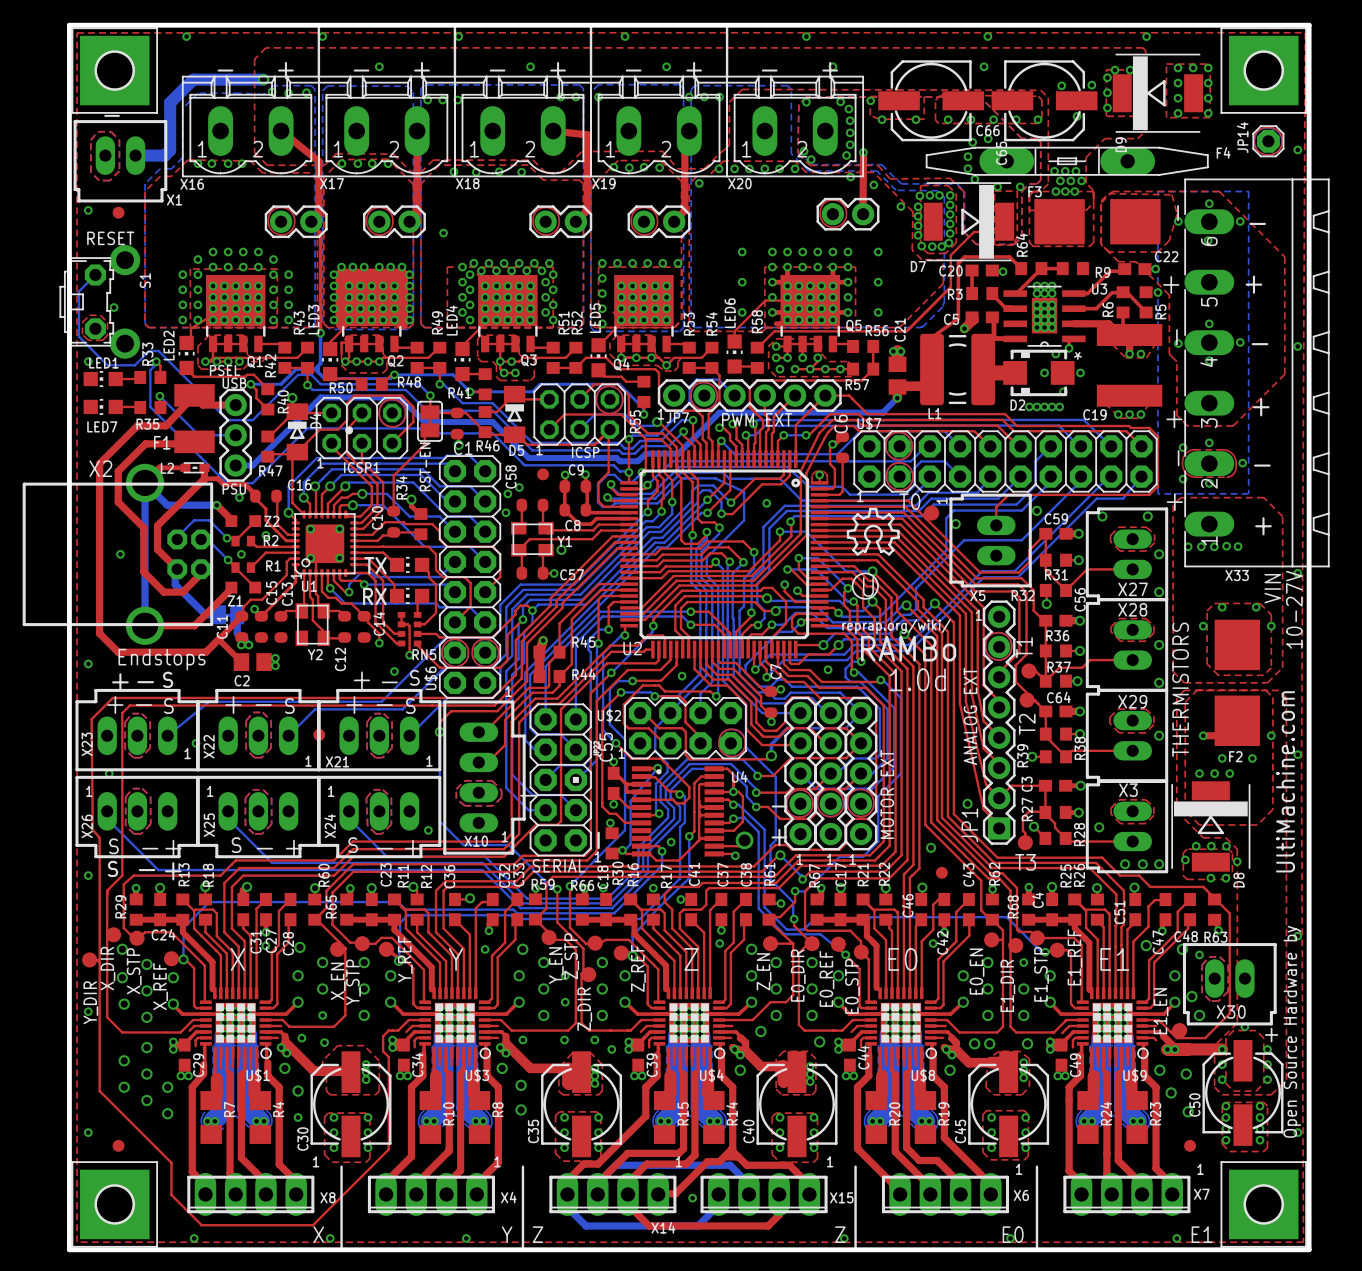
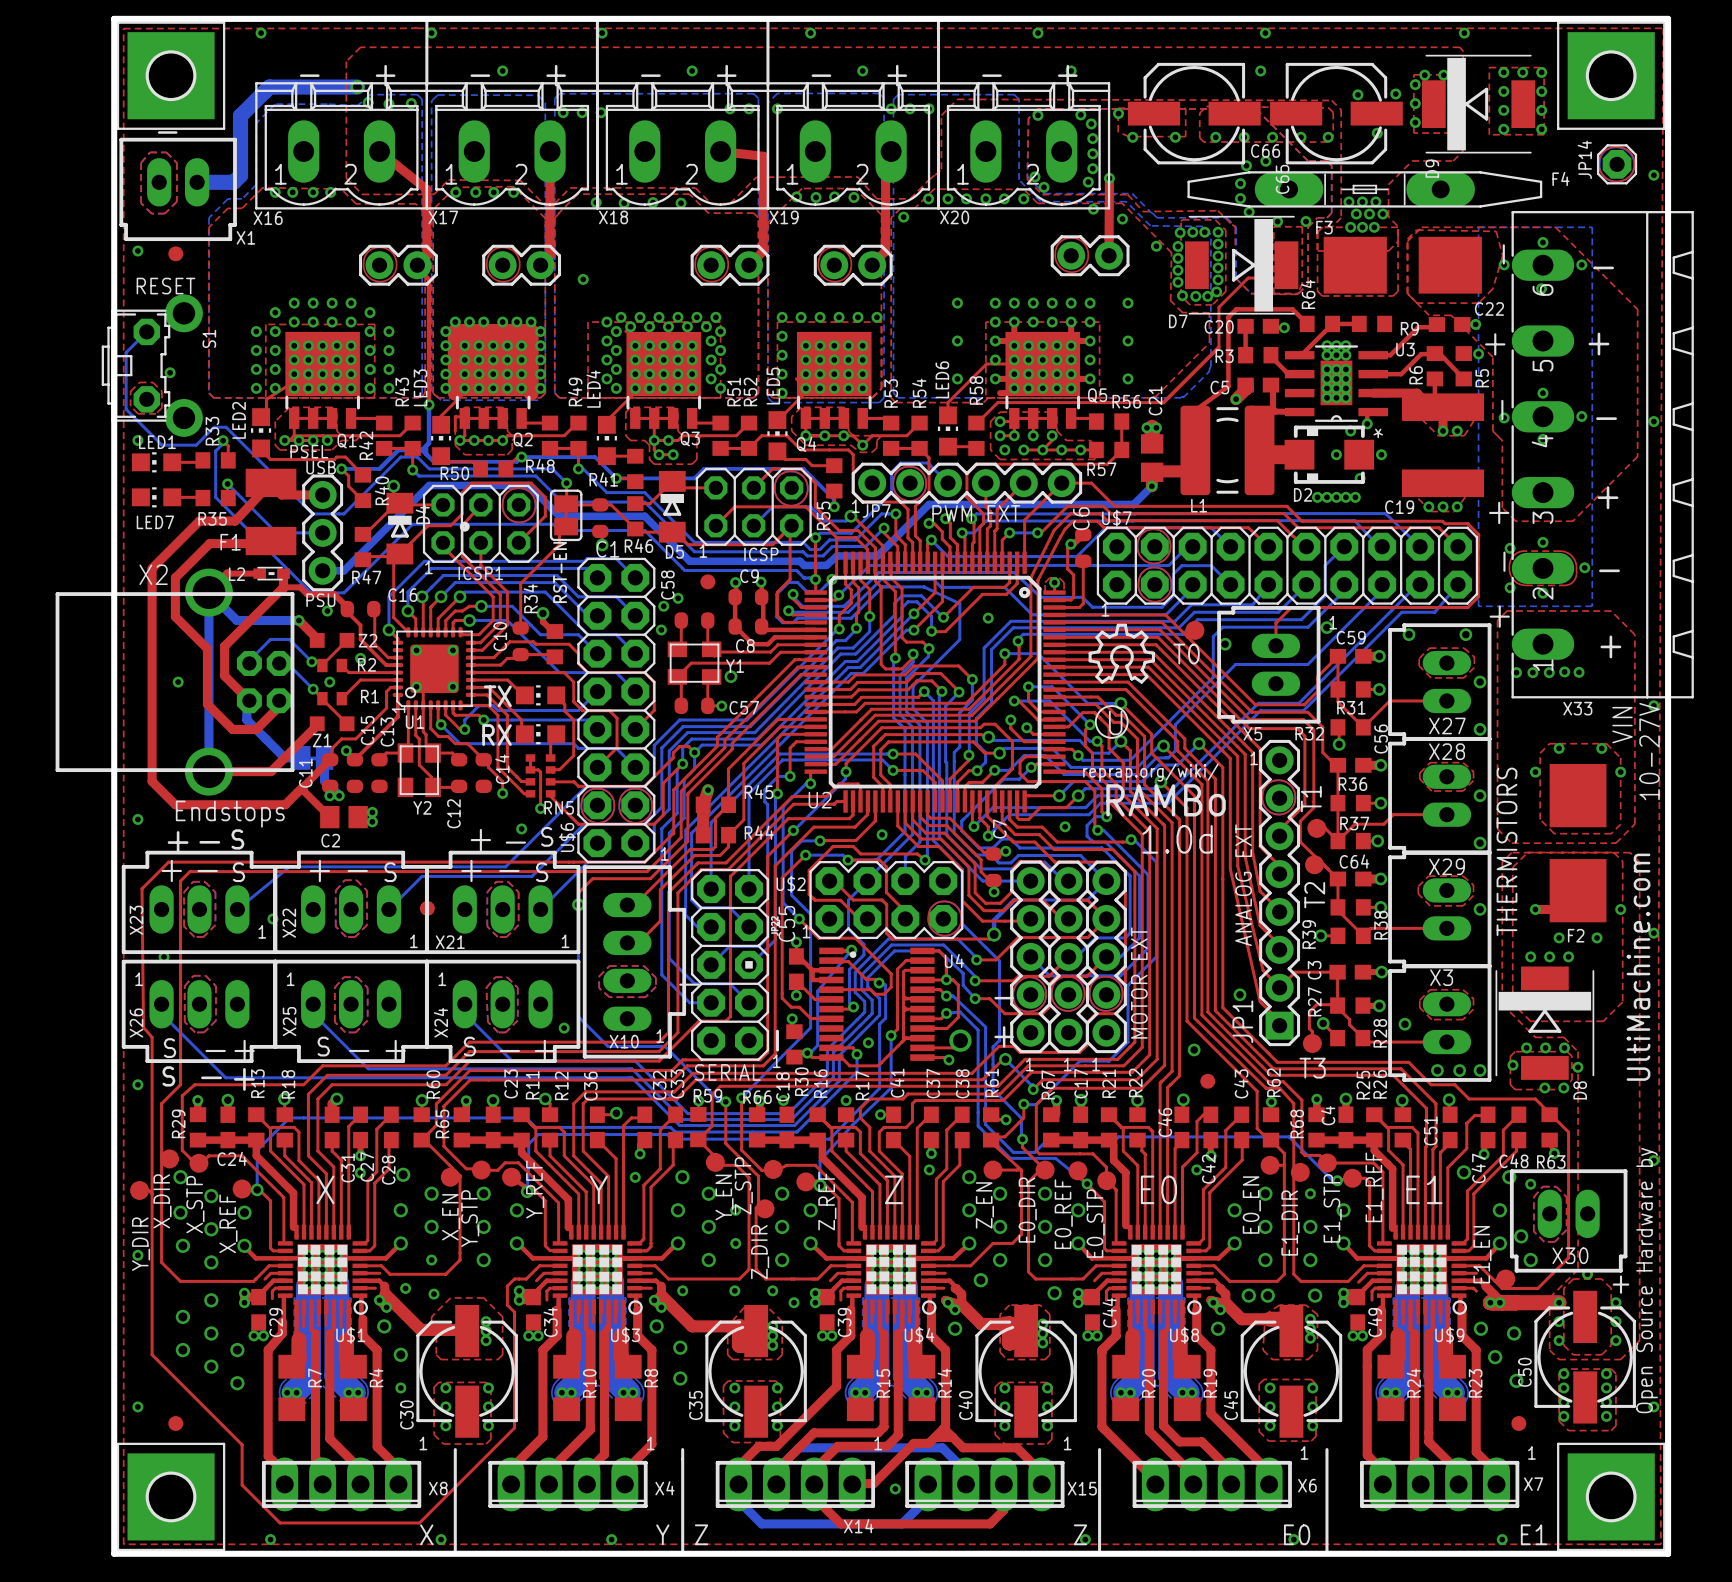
text rotation: 0° (941, 500) -> 90° clockwise (1333, 622)
text position: 1 (941, 500) -> 1 (1333, 622)
T0 name position: T0 (909, 501) -> T0 (1186, 654)

